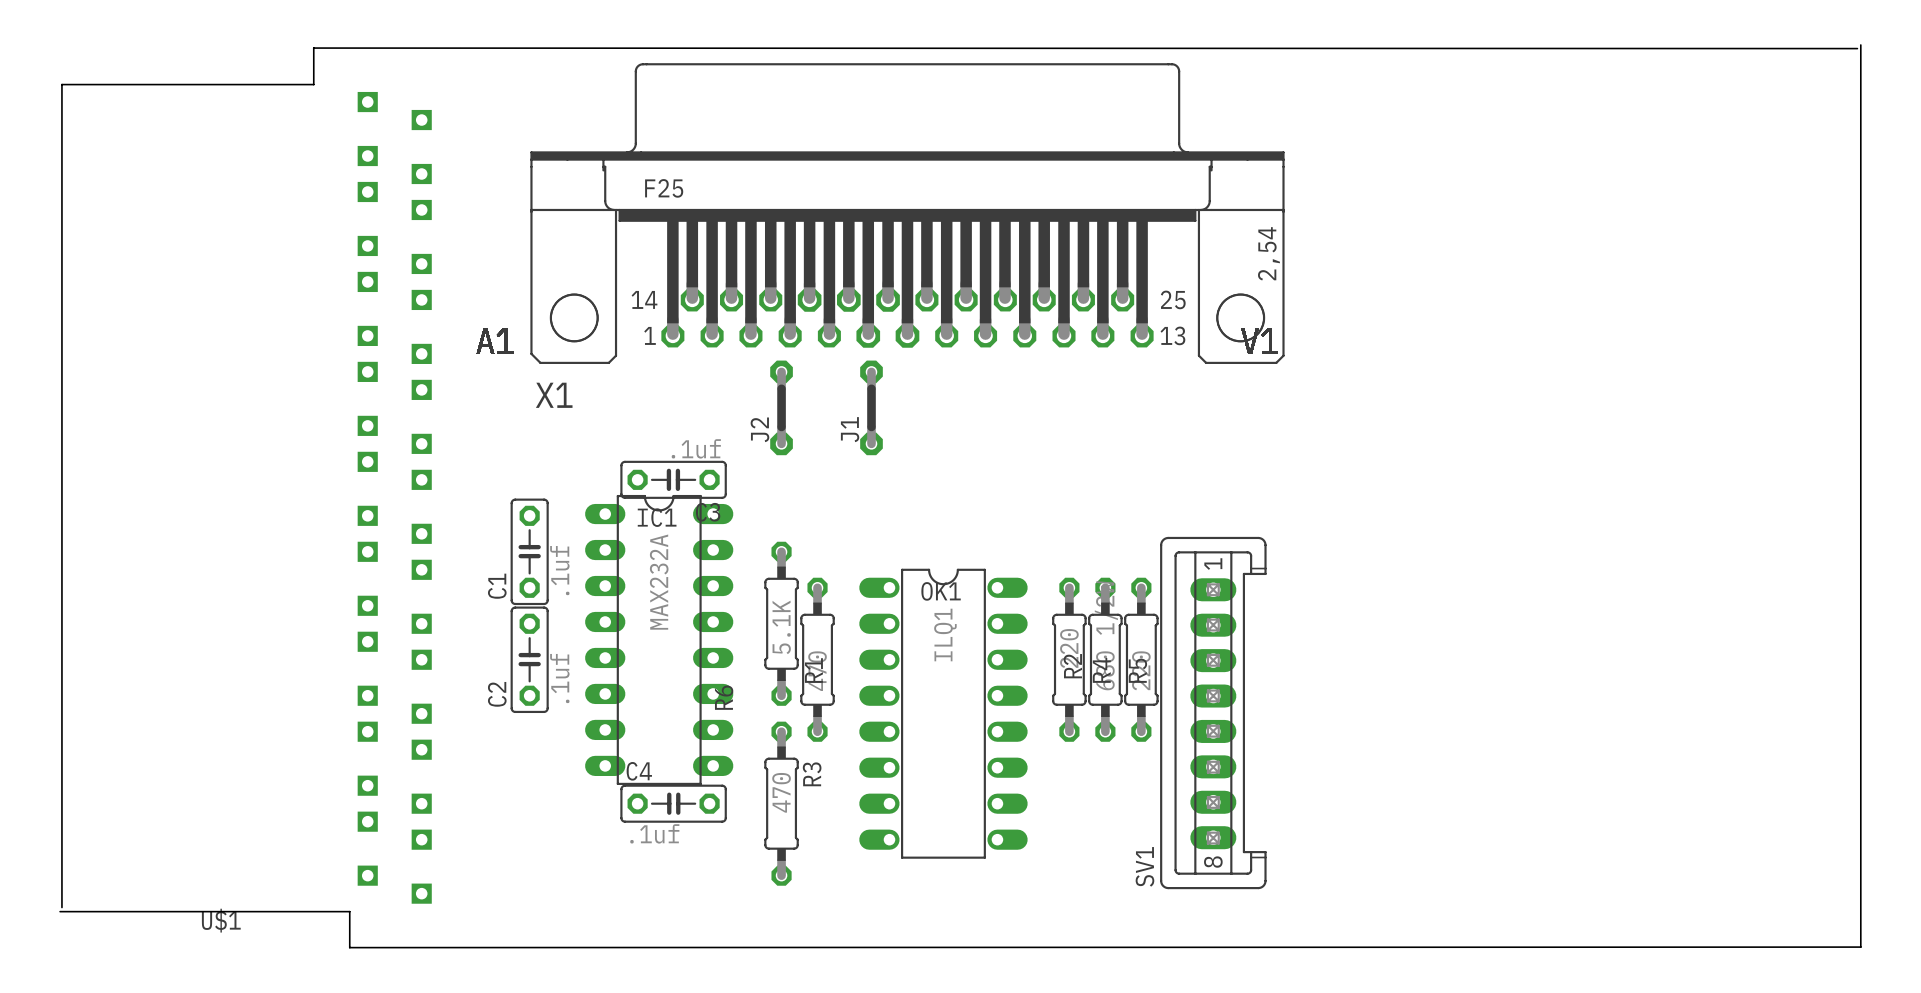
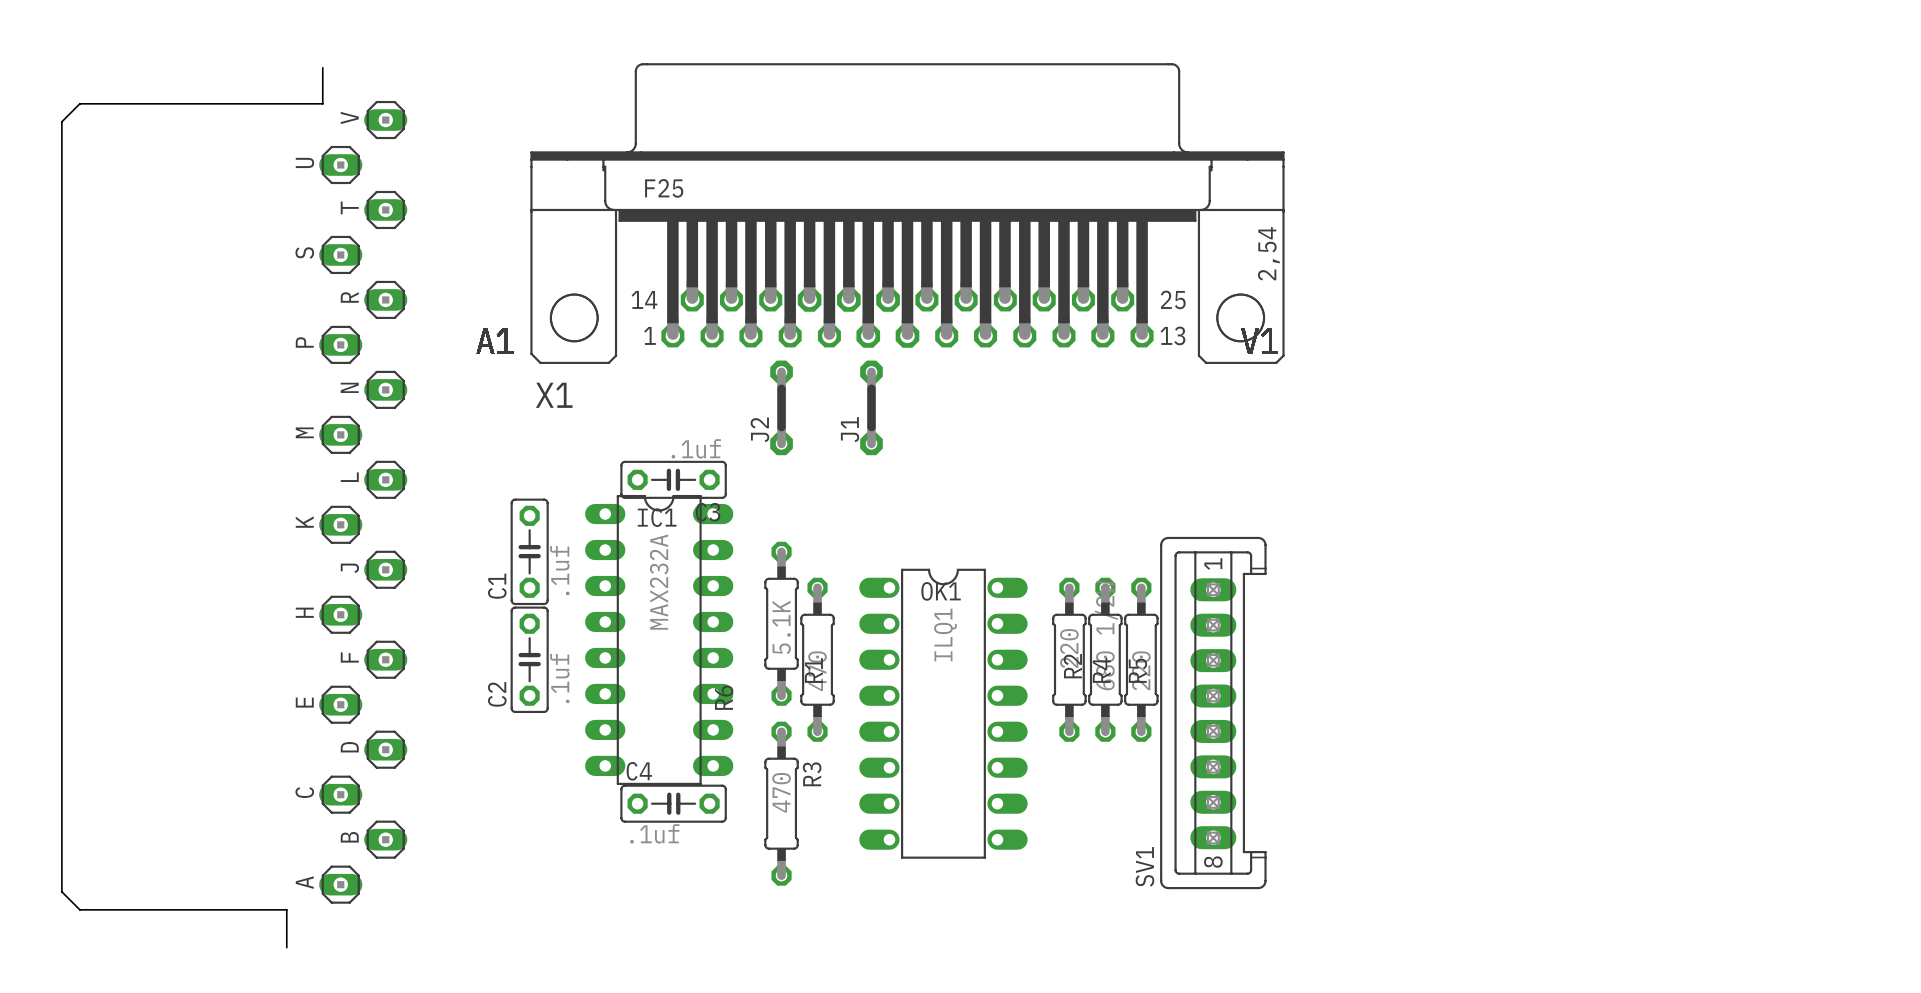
board edge: (1860, 45) (1860, 947) (349, 947) (349, 911) (60, 911) -> none
board edge: (1857, 48) (313, 48) (313, 84) (61, 84) (61, 907) -> none
U$1: (394, 497) -> none
part: none -> (363, 502)
part: none -> (192, 507)

